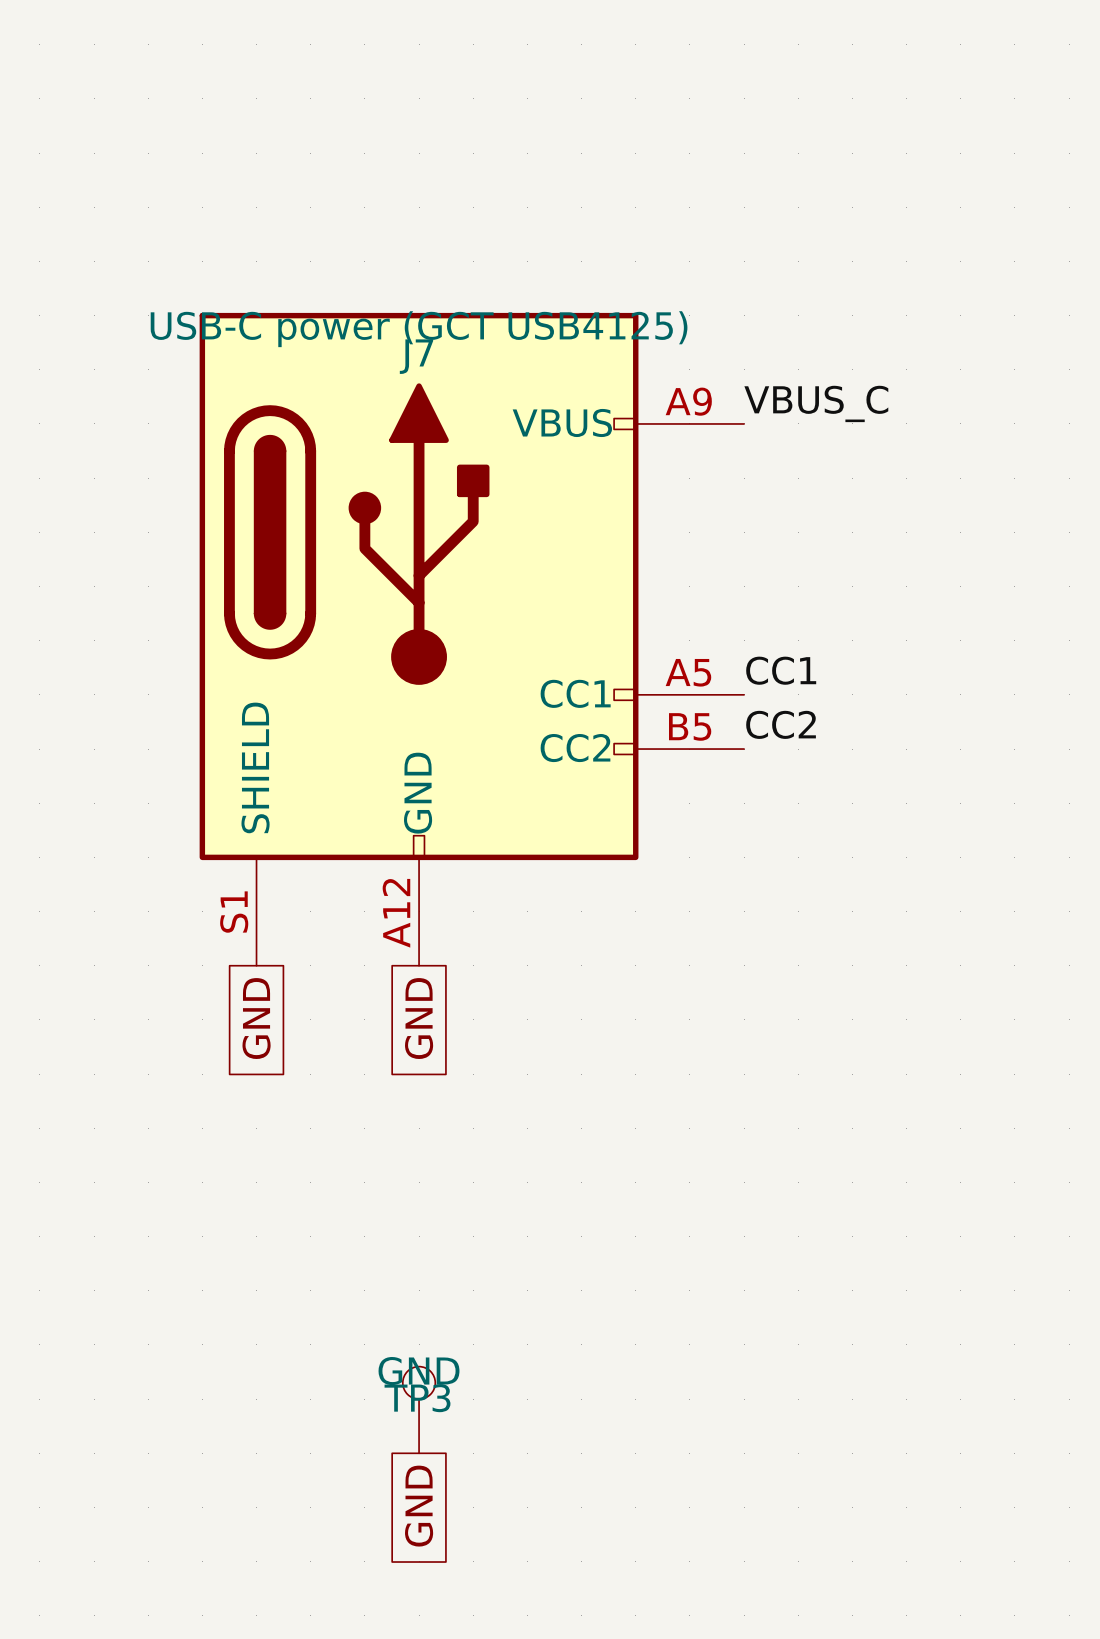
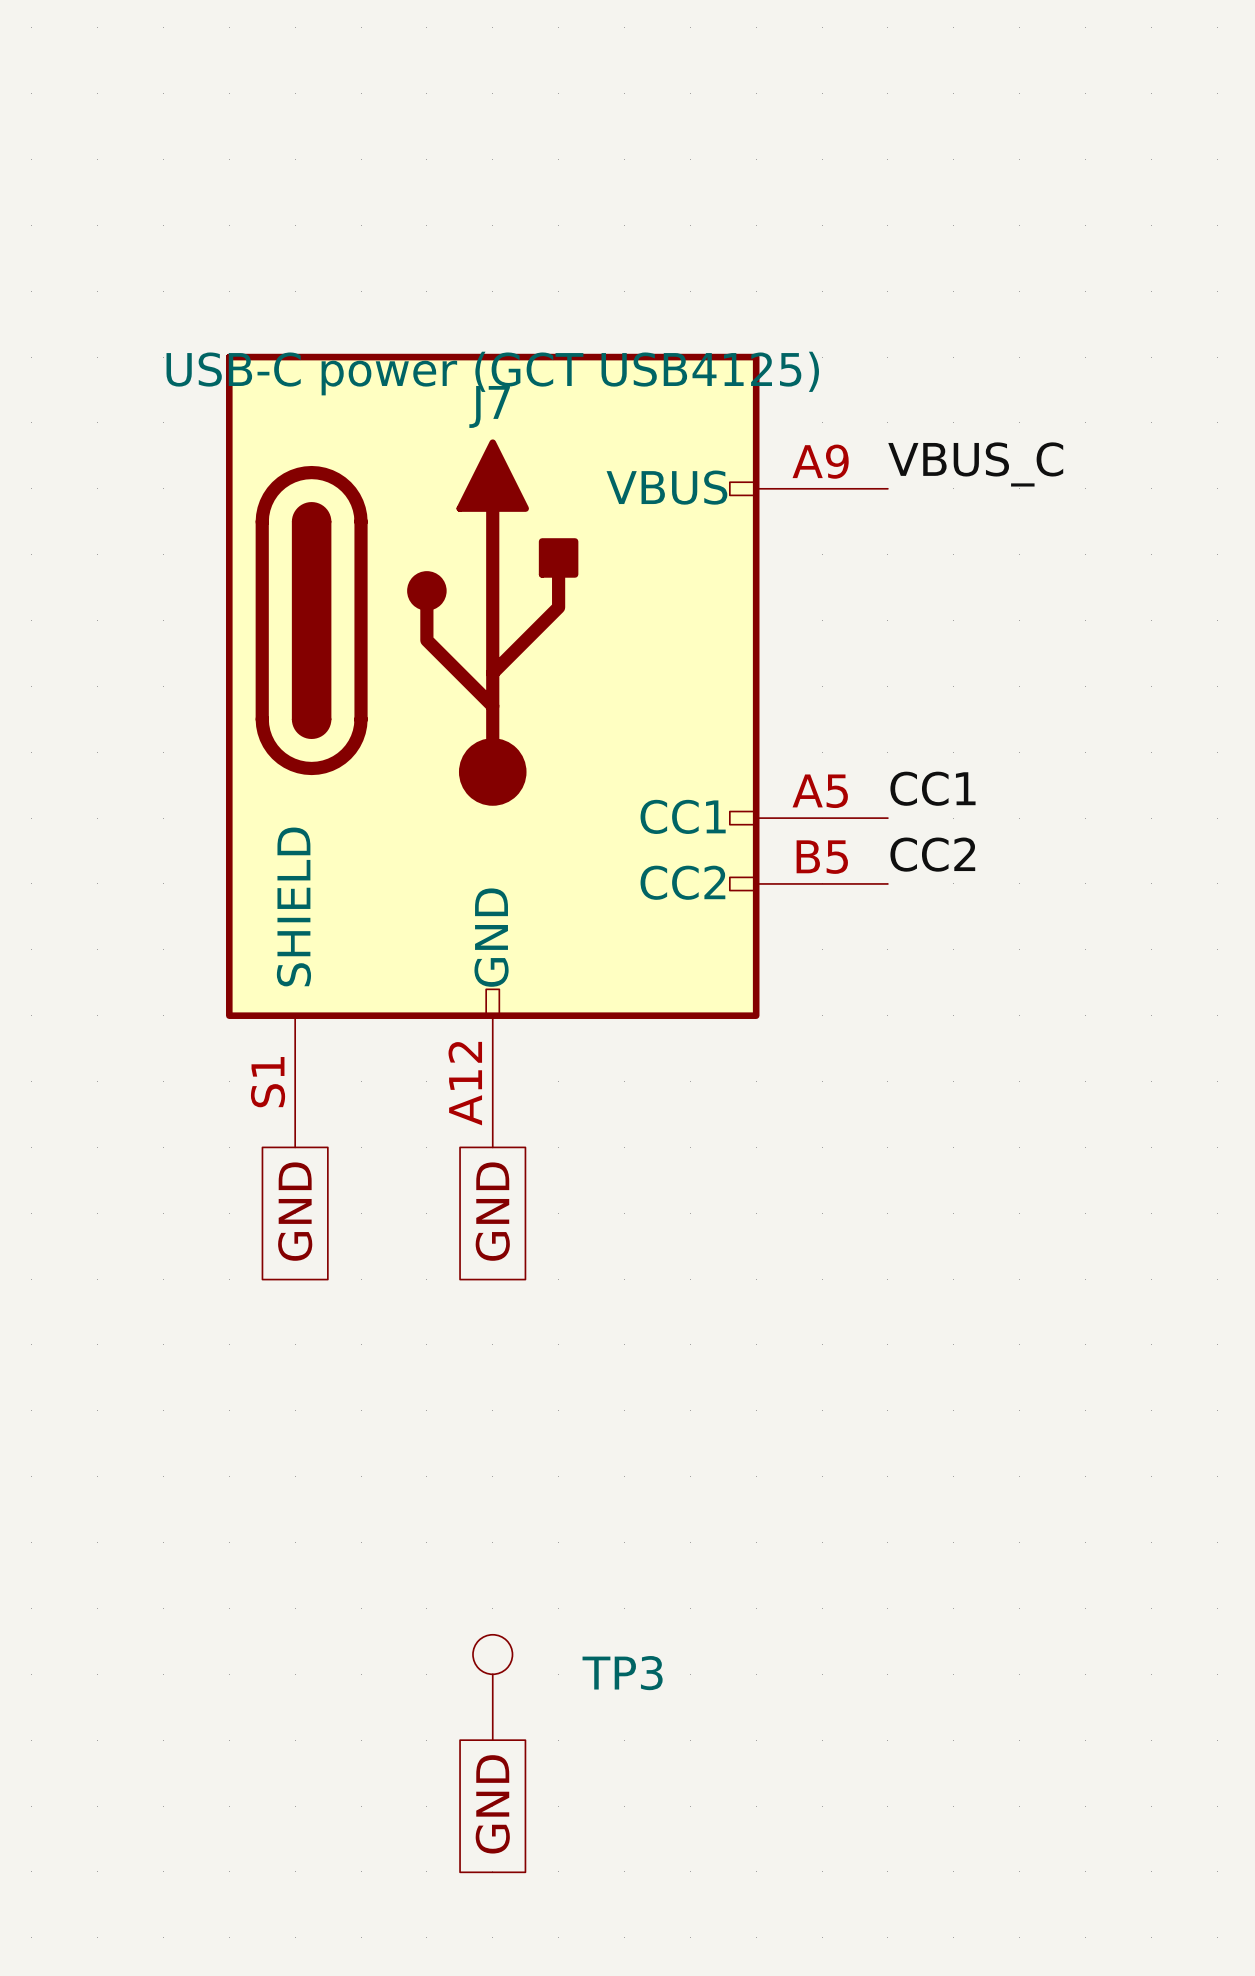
TP3 value: GND (418, 1371) -> none
TP3 name position: TP3 (417, 1398) -> TP3 (622, 1673)

